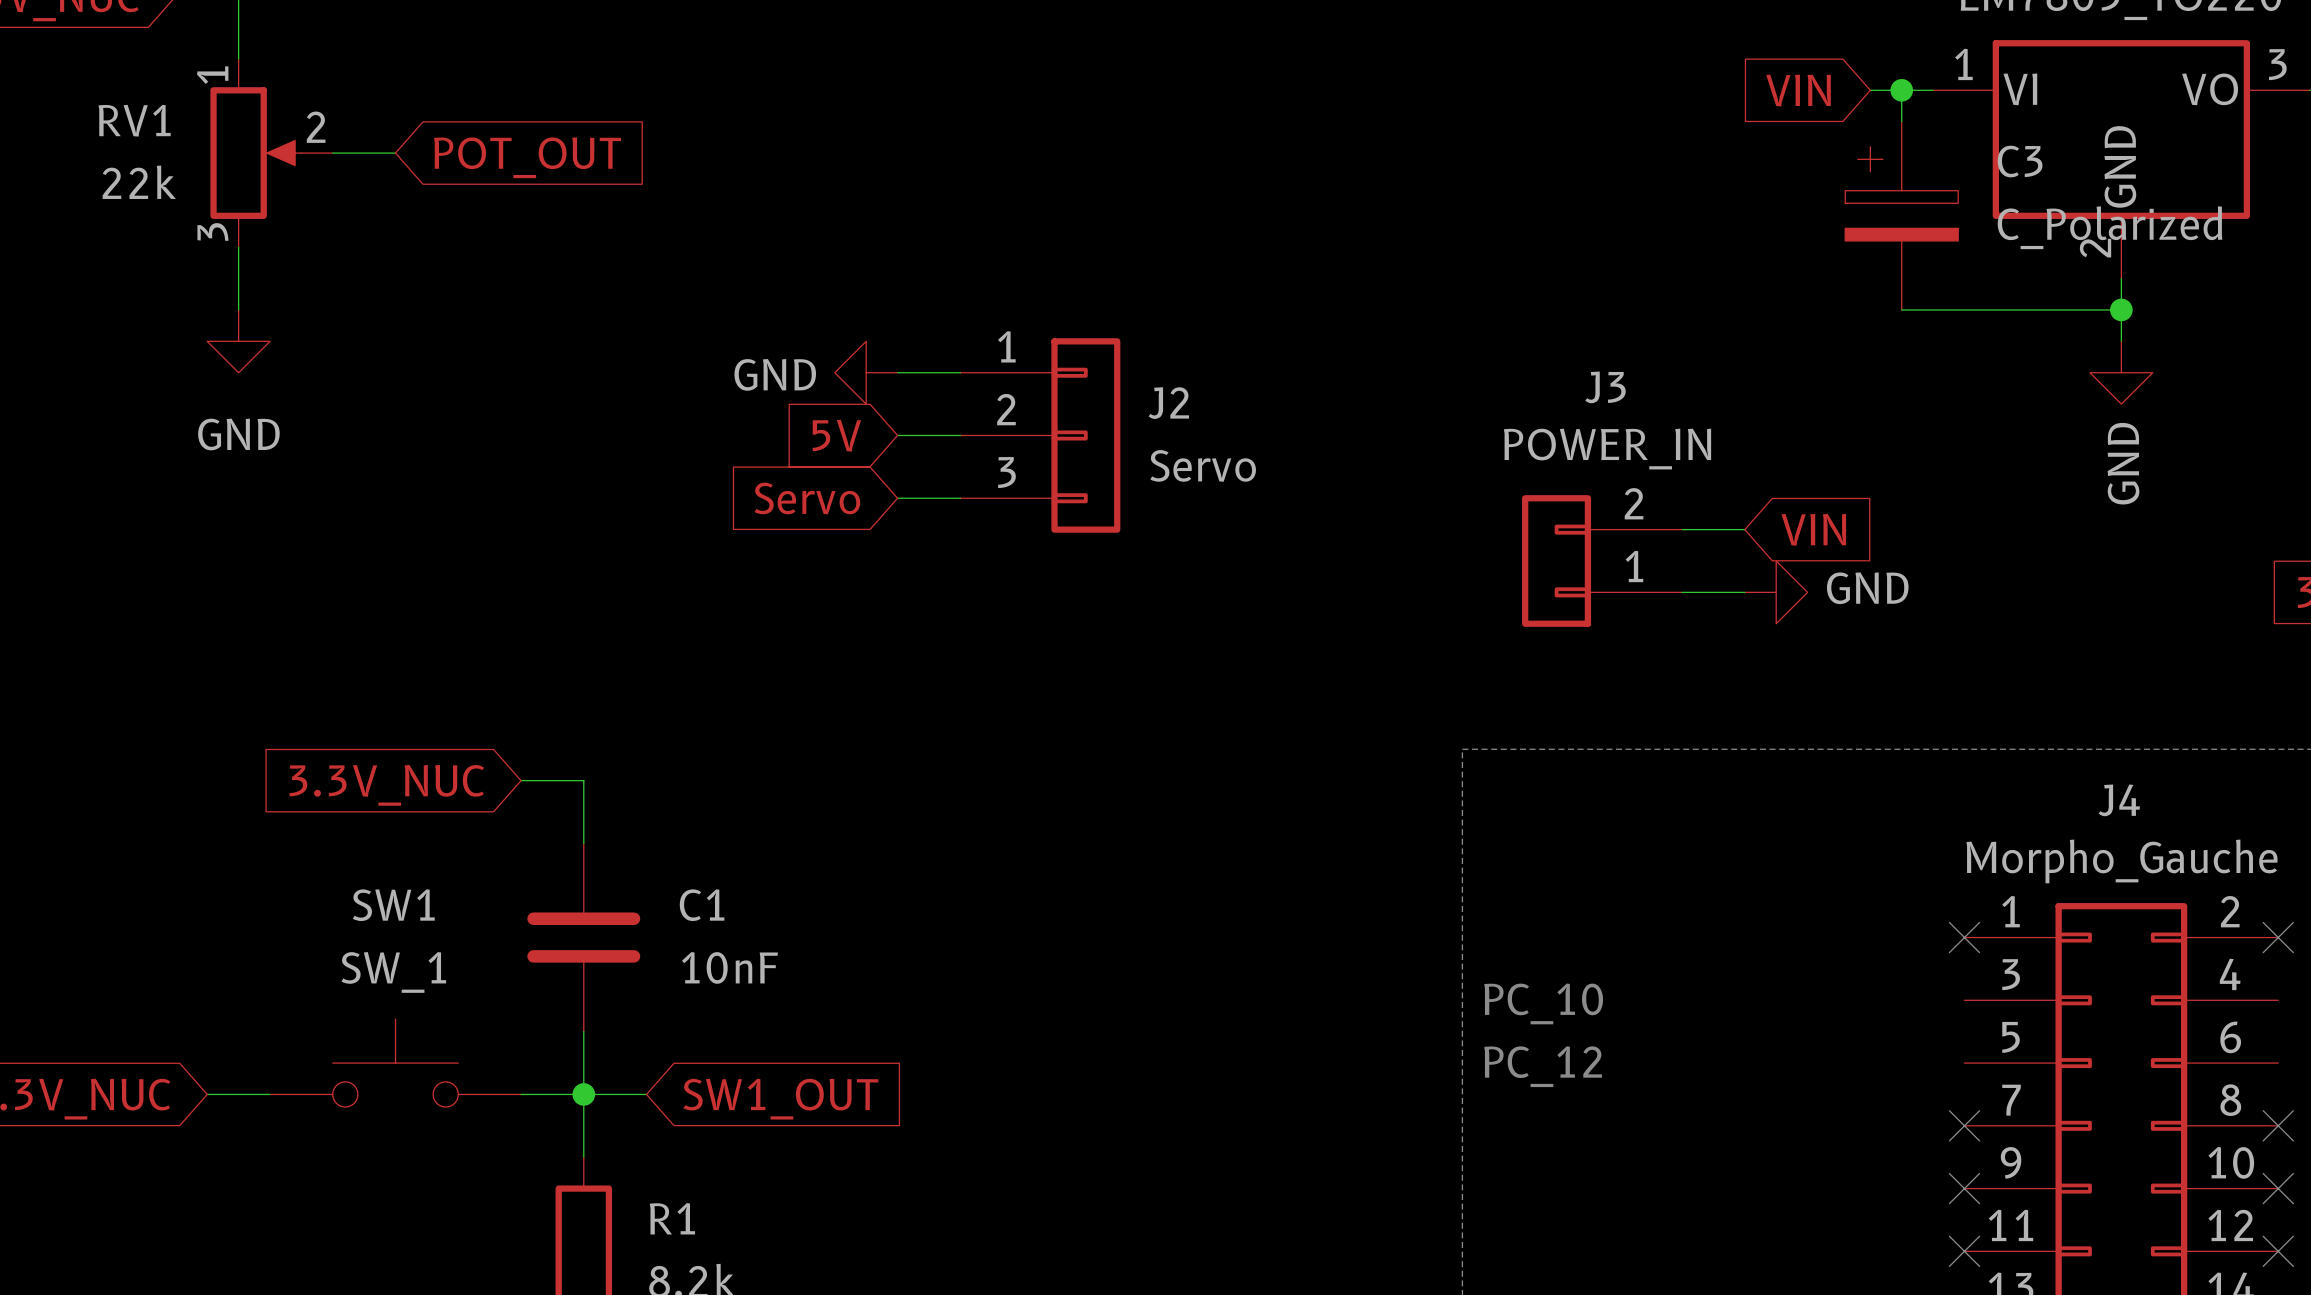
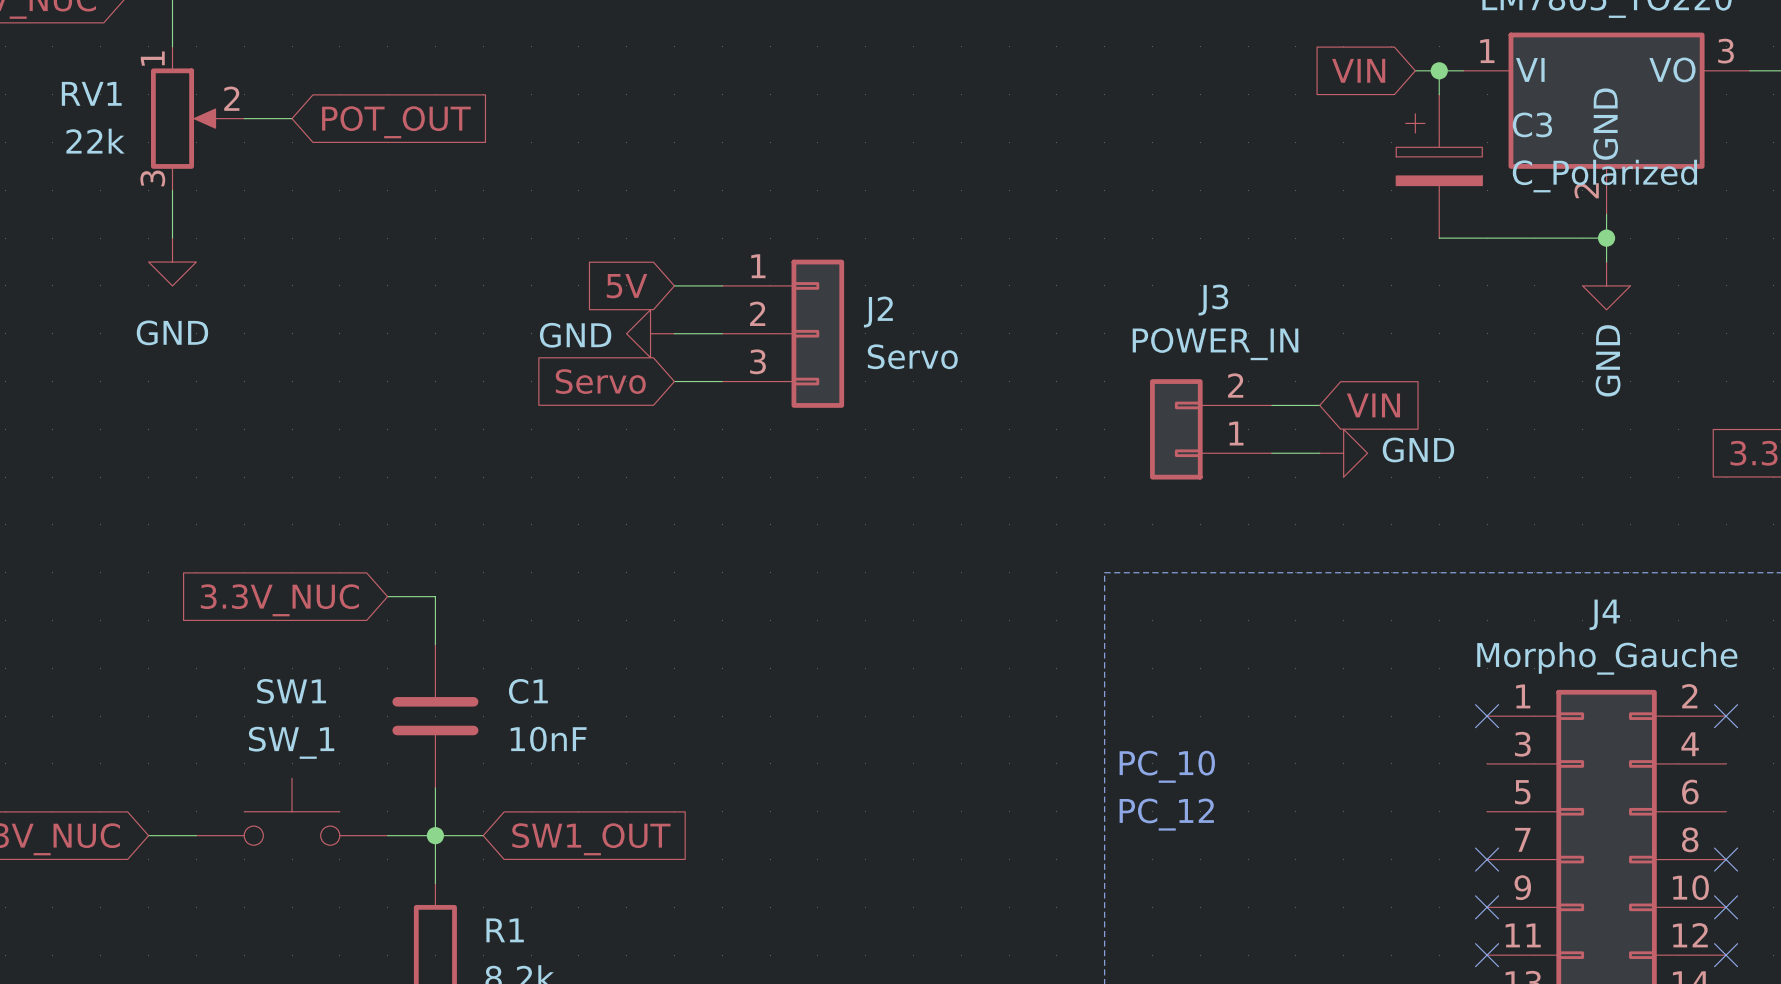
power symbol position: GND (866, 372) -> GND (650, 333)
global label position: 5V (836, 435) -> 5V (627, 286)

